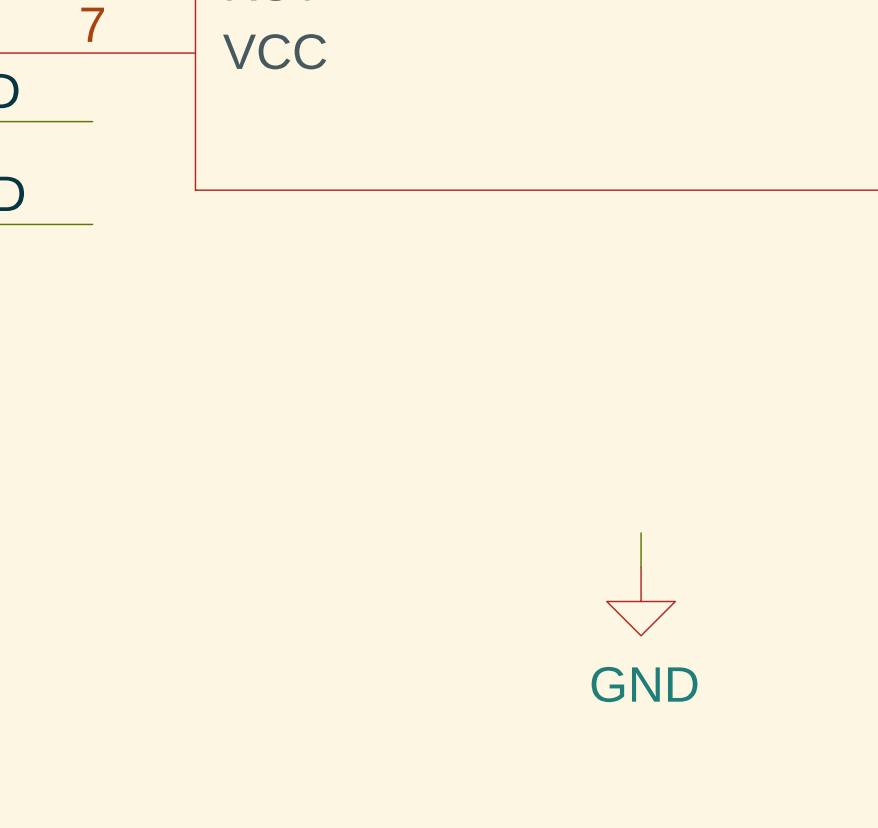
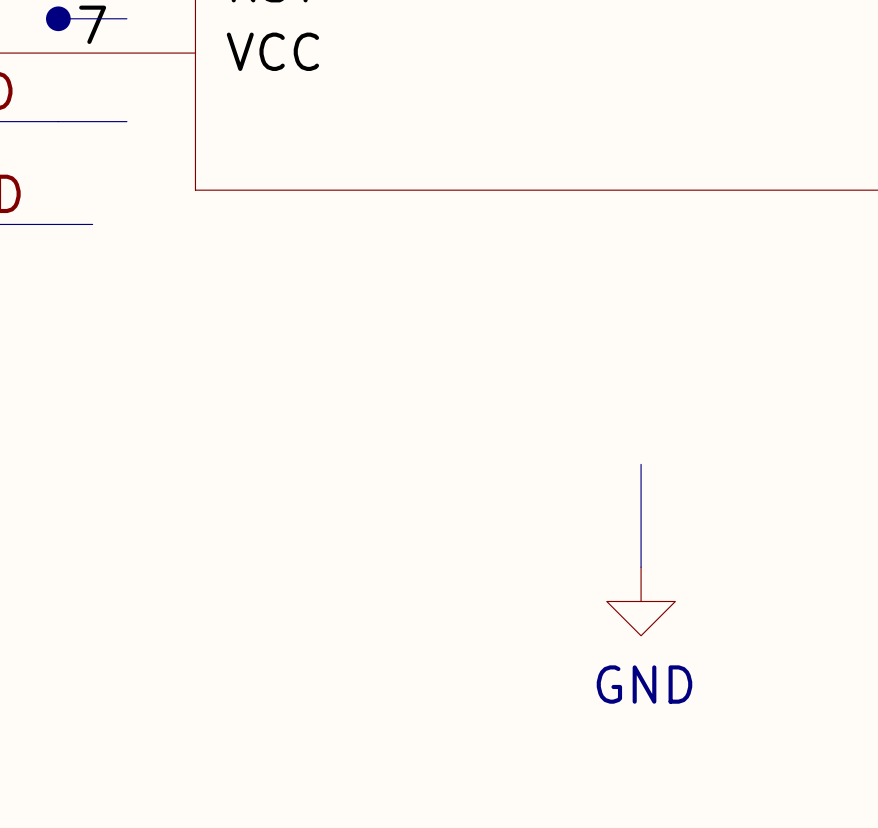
wire: none -> (58, 18) (126, 18)
junction: none -> (58, 18)
wire: none -> (92, 121) (126, 121)
wire: none -> (641, 464) (641, 532)

